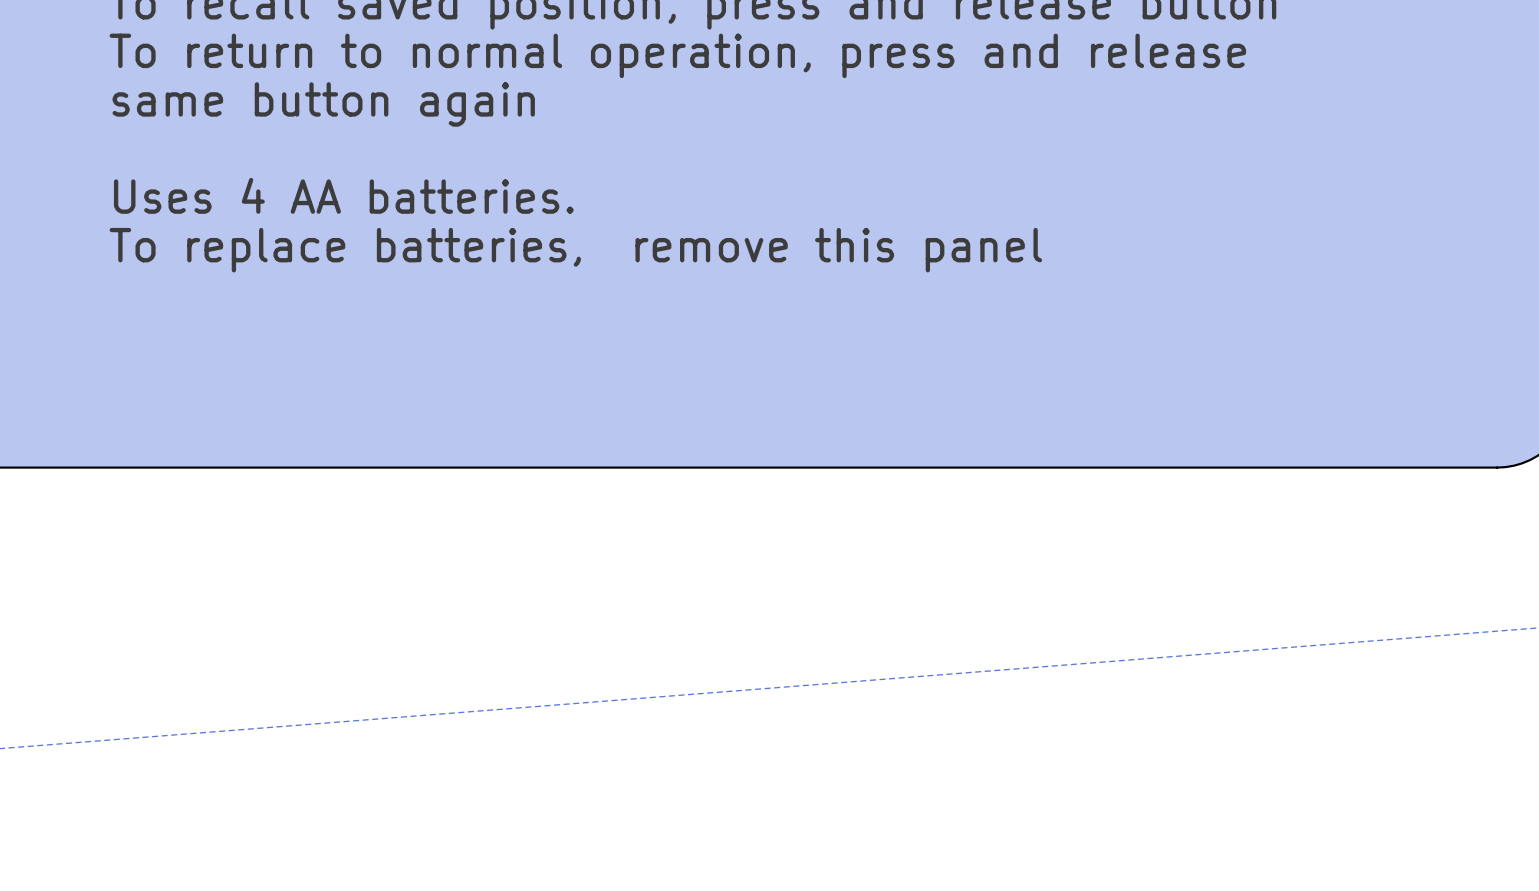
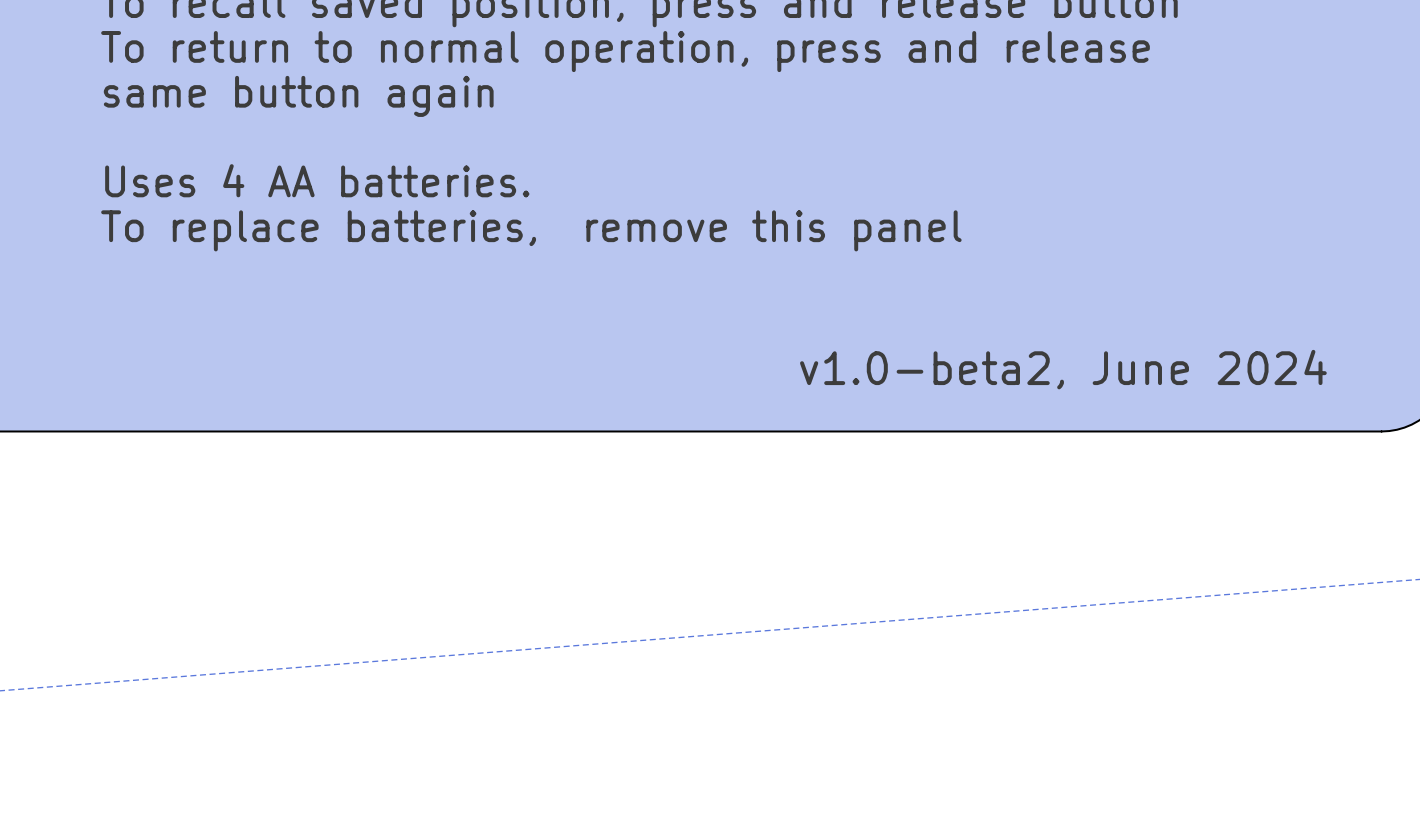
text: none -> v1.0-beta2, June 2024 (1063, 369)

